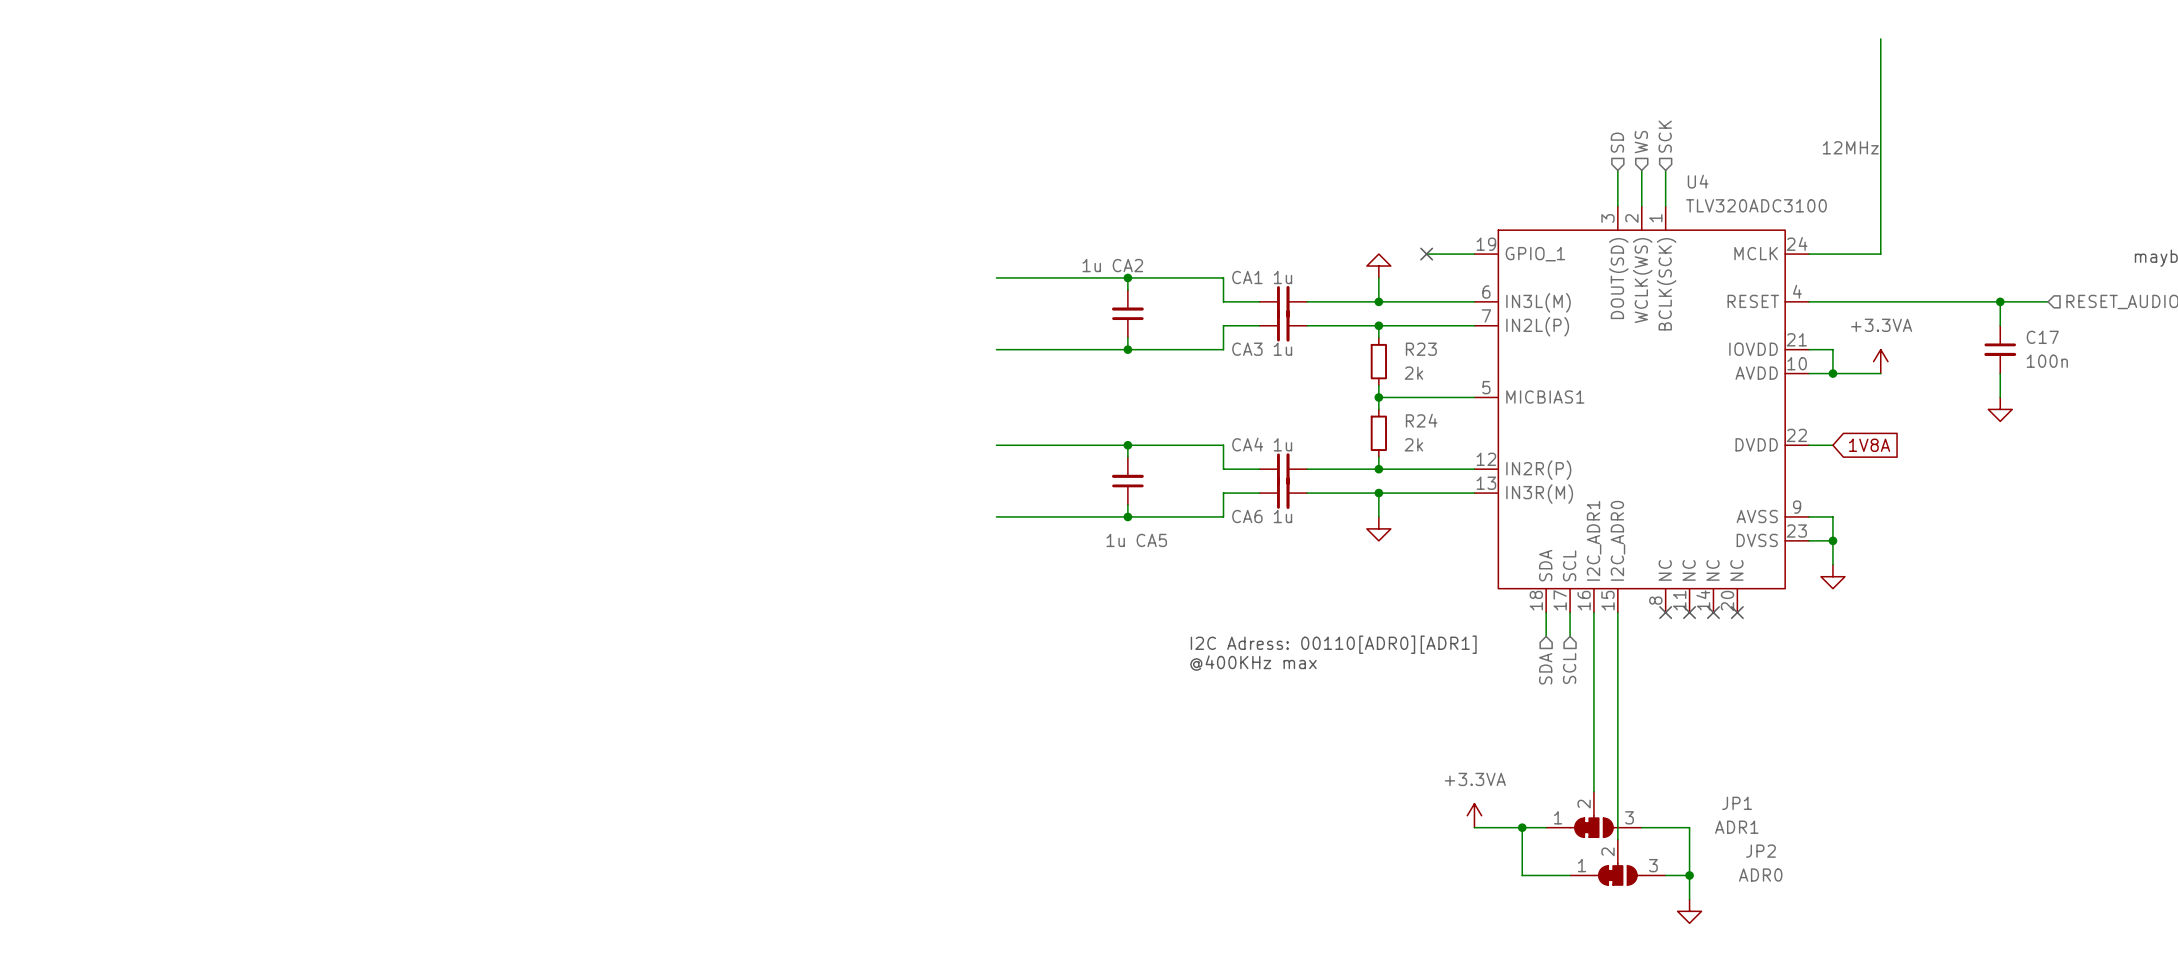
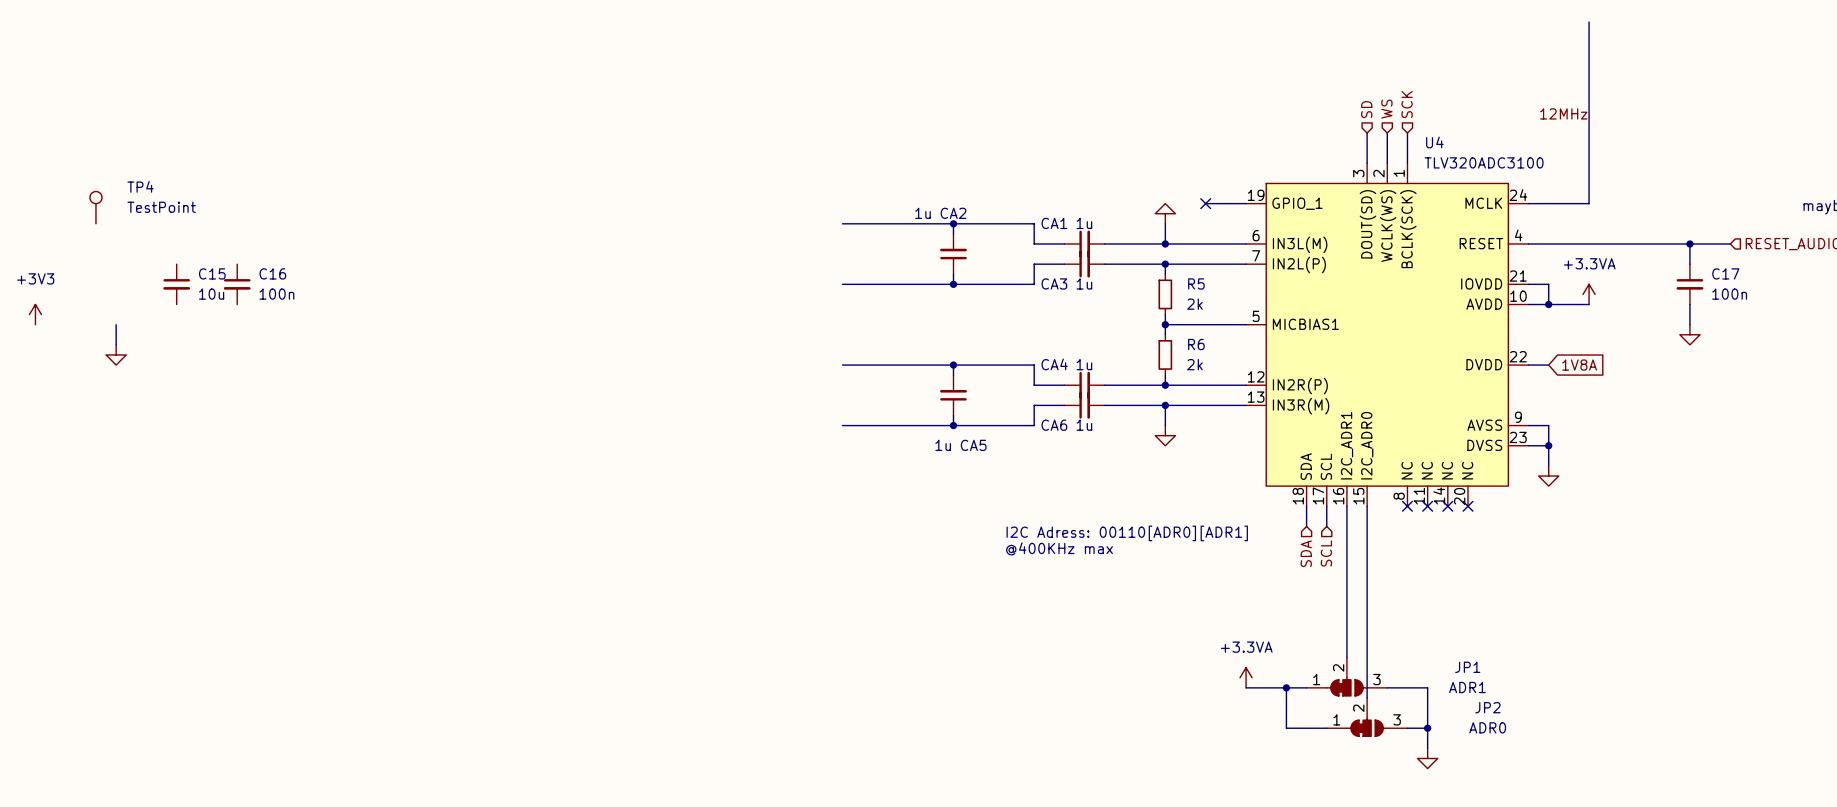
TP4: none -> TestPoint (95, 207)
C15: none -> 10u (176, 284)
C16: none -> 100n (237, 284)
R23 name: R23 (1421, 349) -> R5 (1196, 283)
power symbol: none -> +3V3 (35, 314)
wire: none -> (116, 324) (116, 344)
R24 name: R24 (1421, 420) -> R6 (1196, 344)
power symbol: none -> (116, 354)

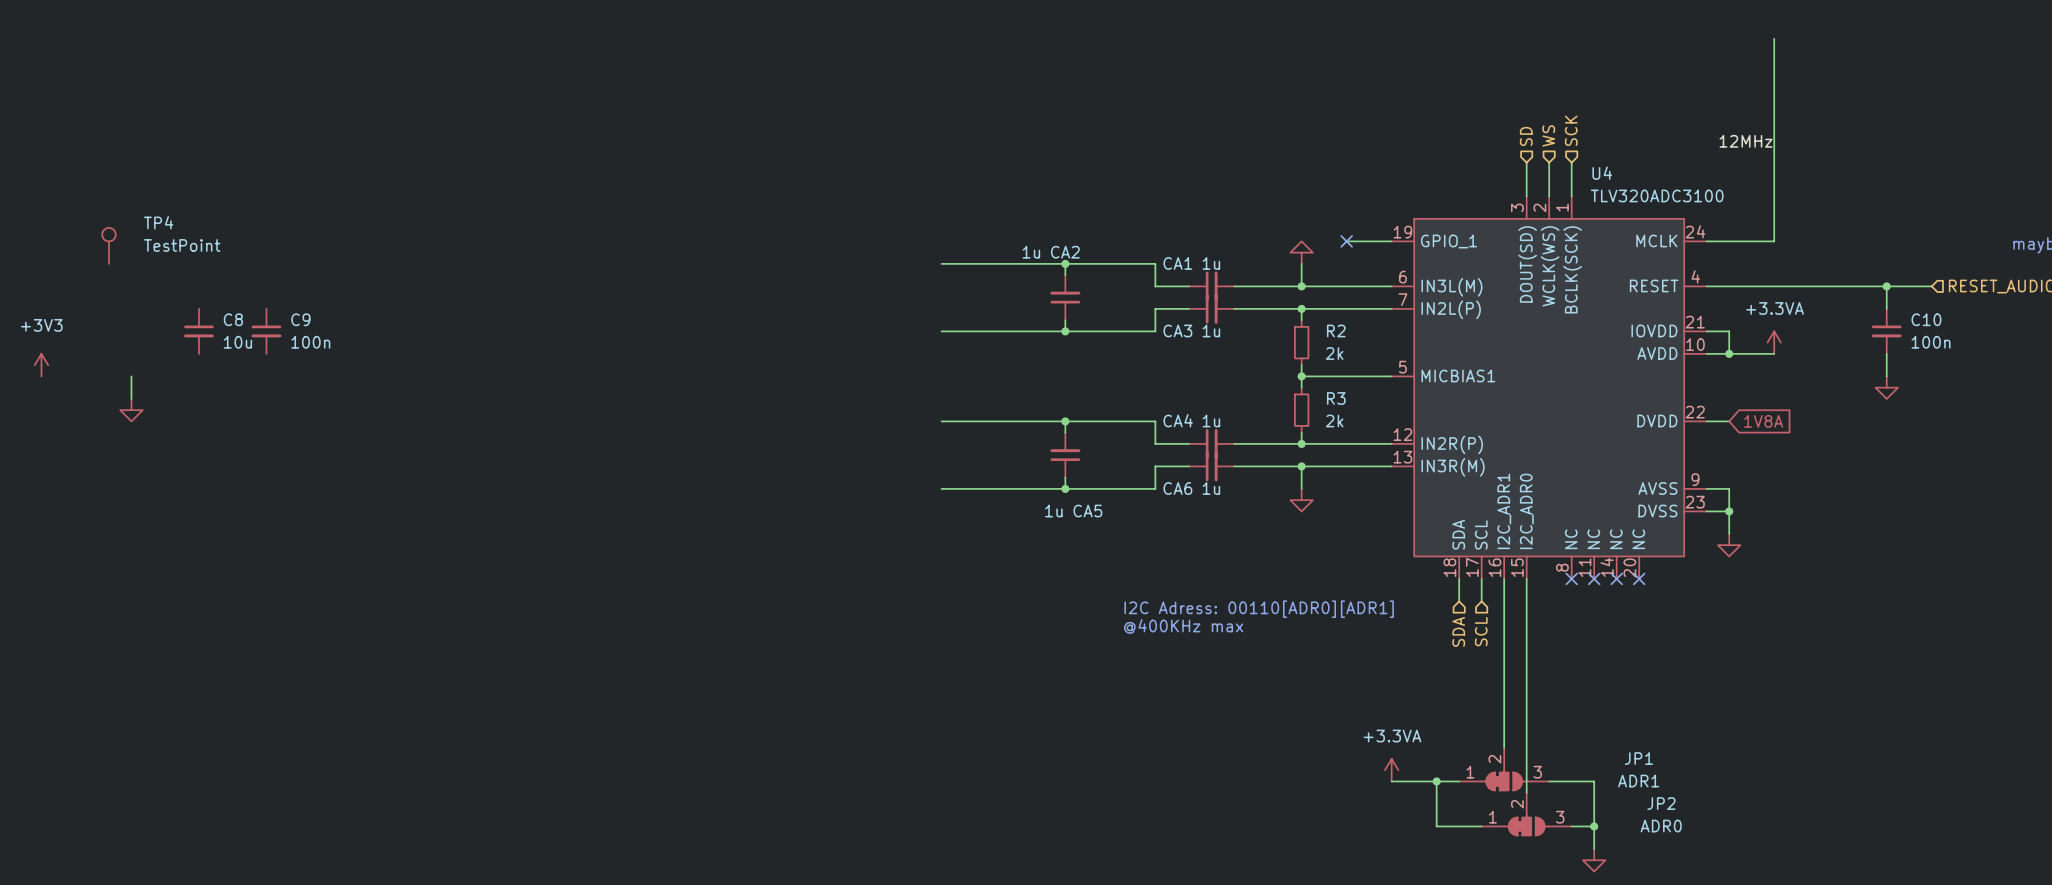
C15 name: C15 (212, 273) -> C8 (233, 319)
C16 name: C16 (272, 273) -> C9 (300, 319)
C17 name: C17 (1725, 273) -> C10 (1926, 319)
R5 name: R5 (1196, 283) -> R2 (1336, 330)
R6 name: R6 (1196, 344) -> R3 (1336, 398)

